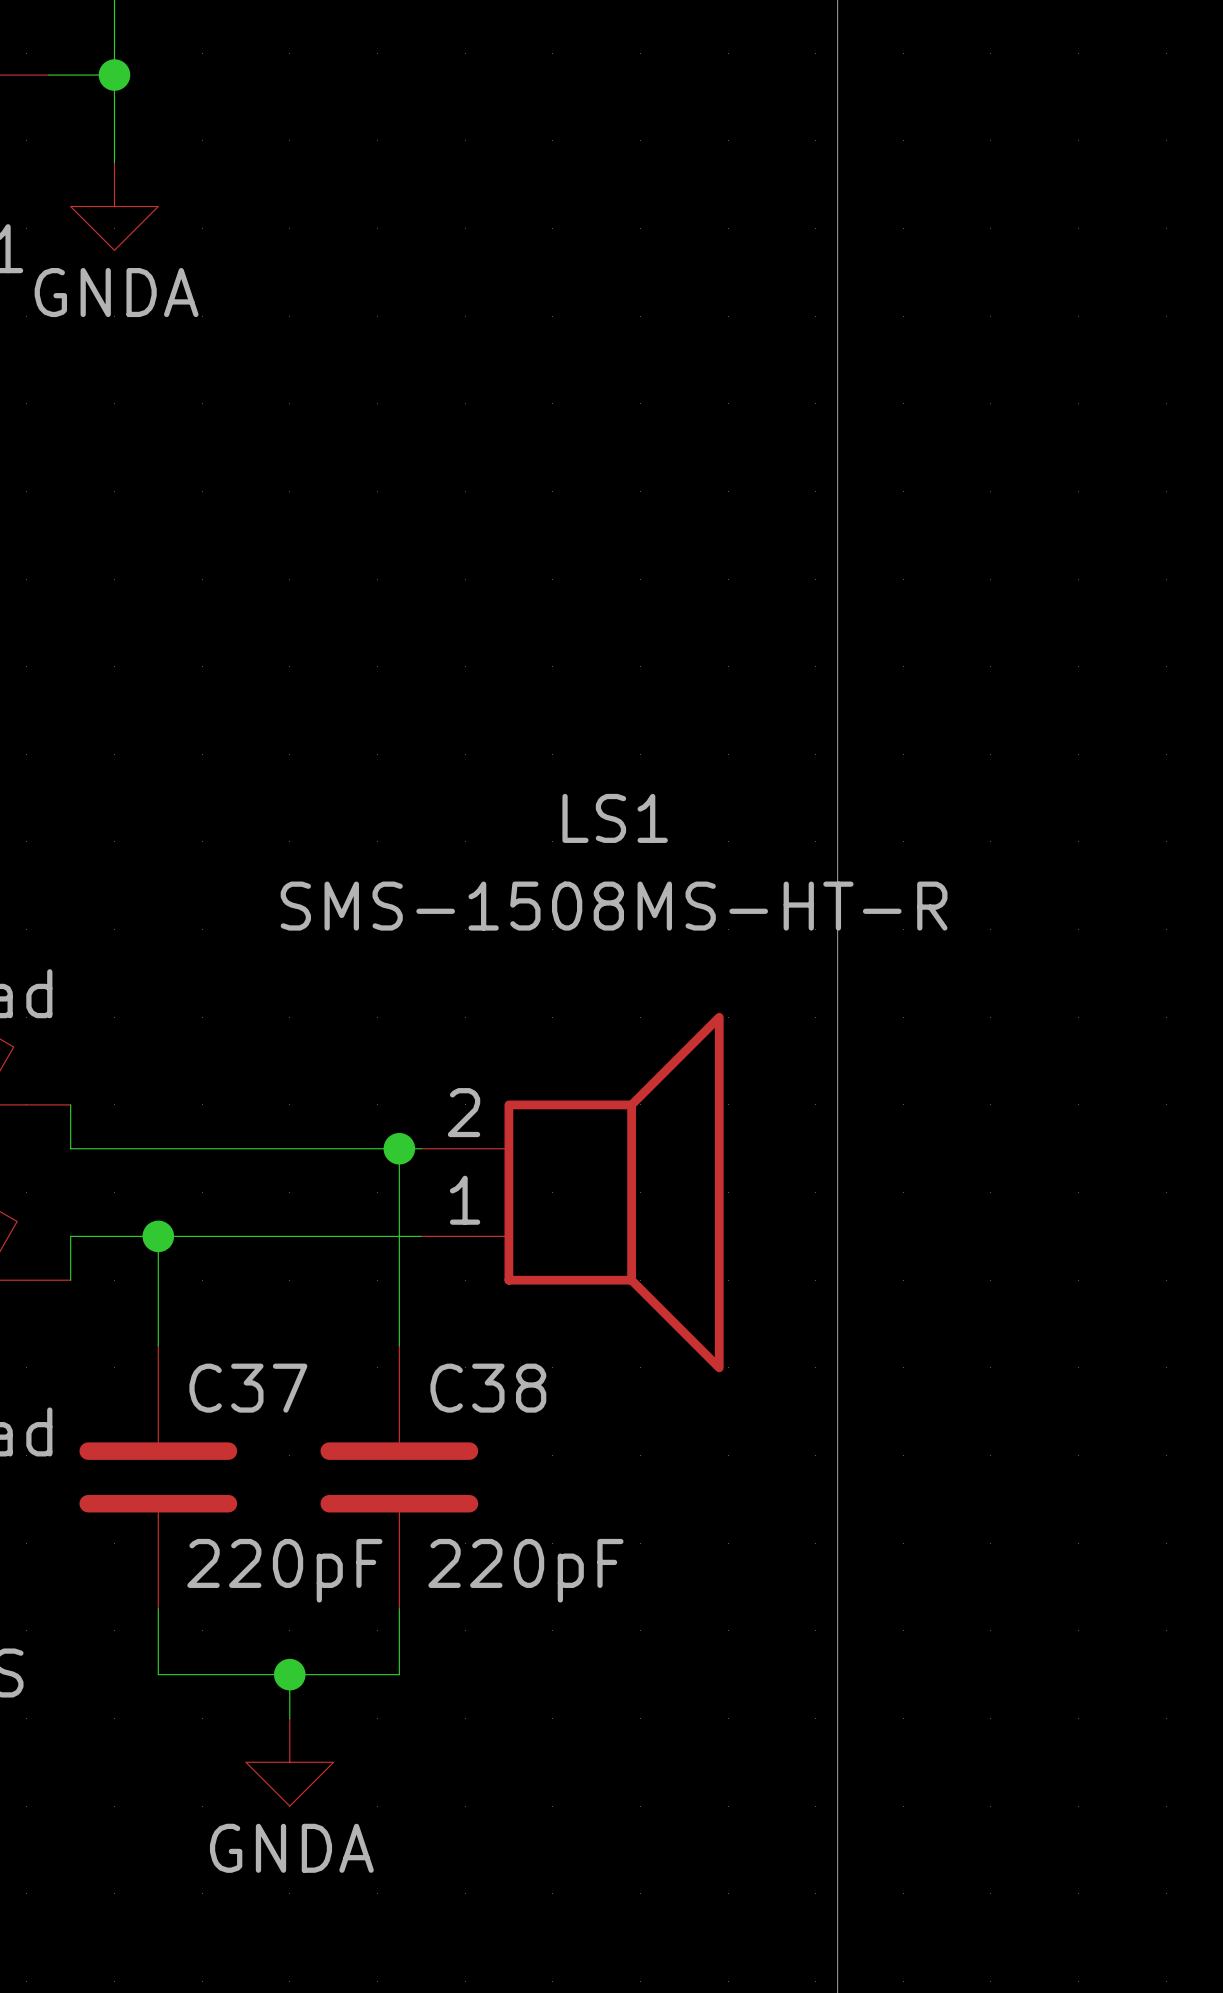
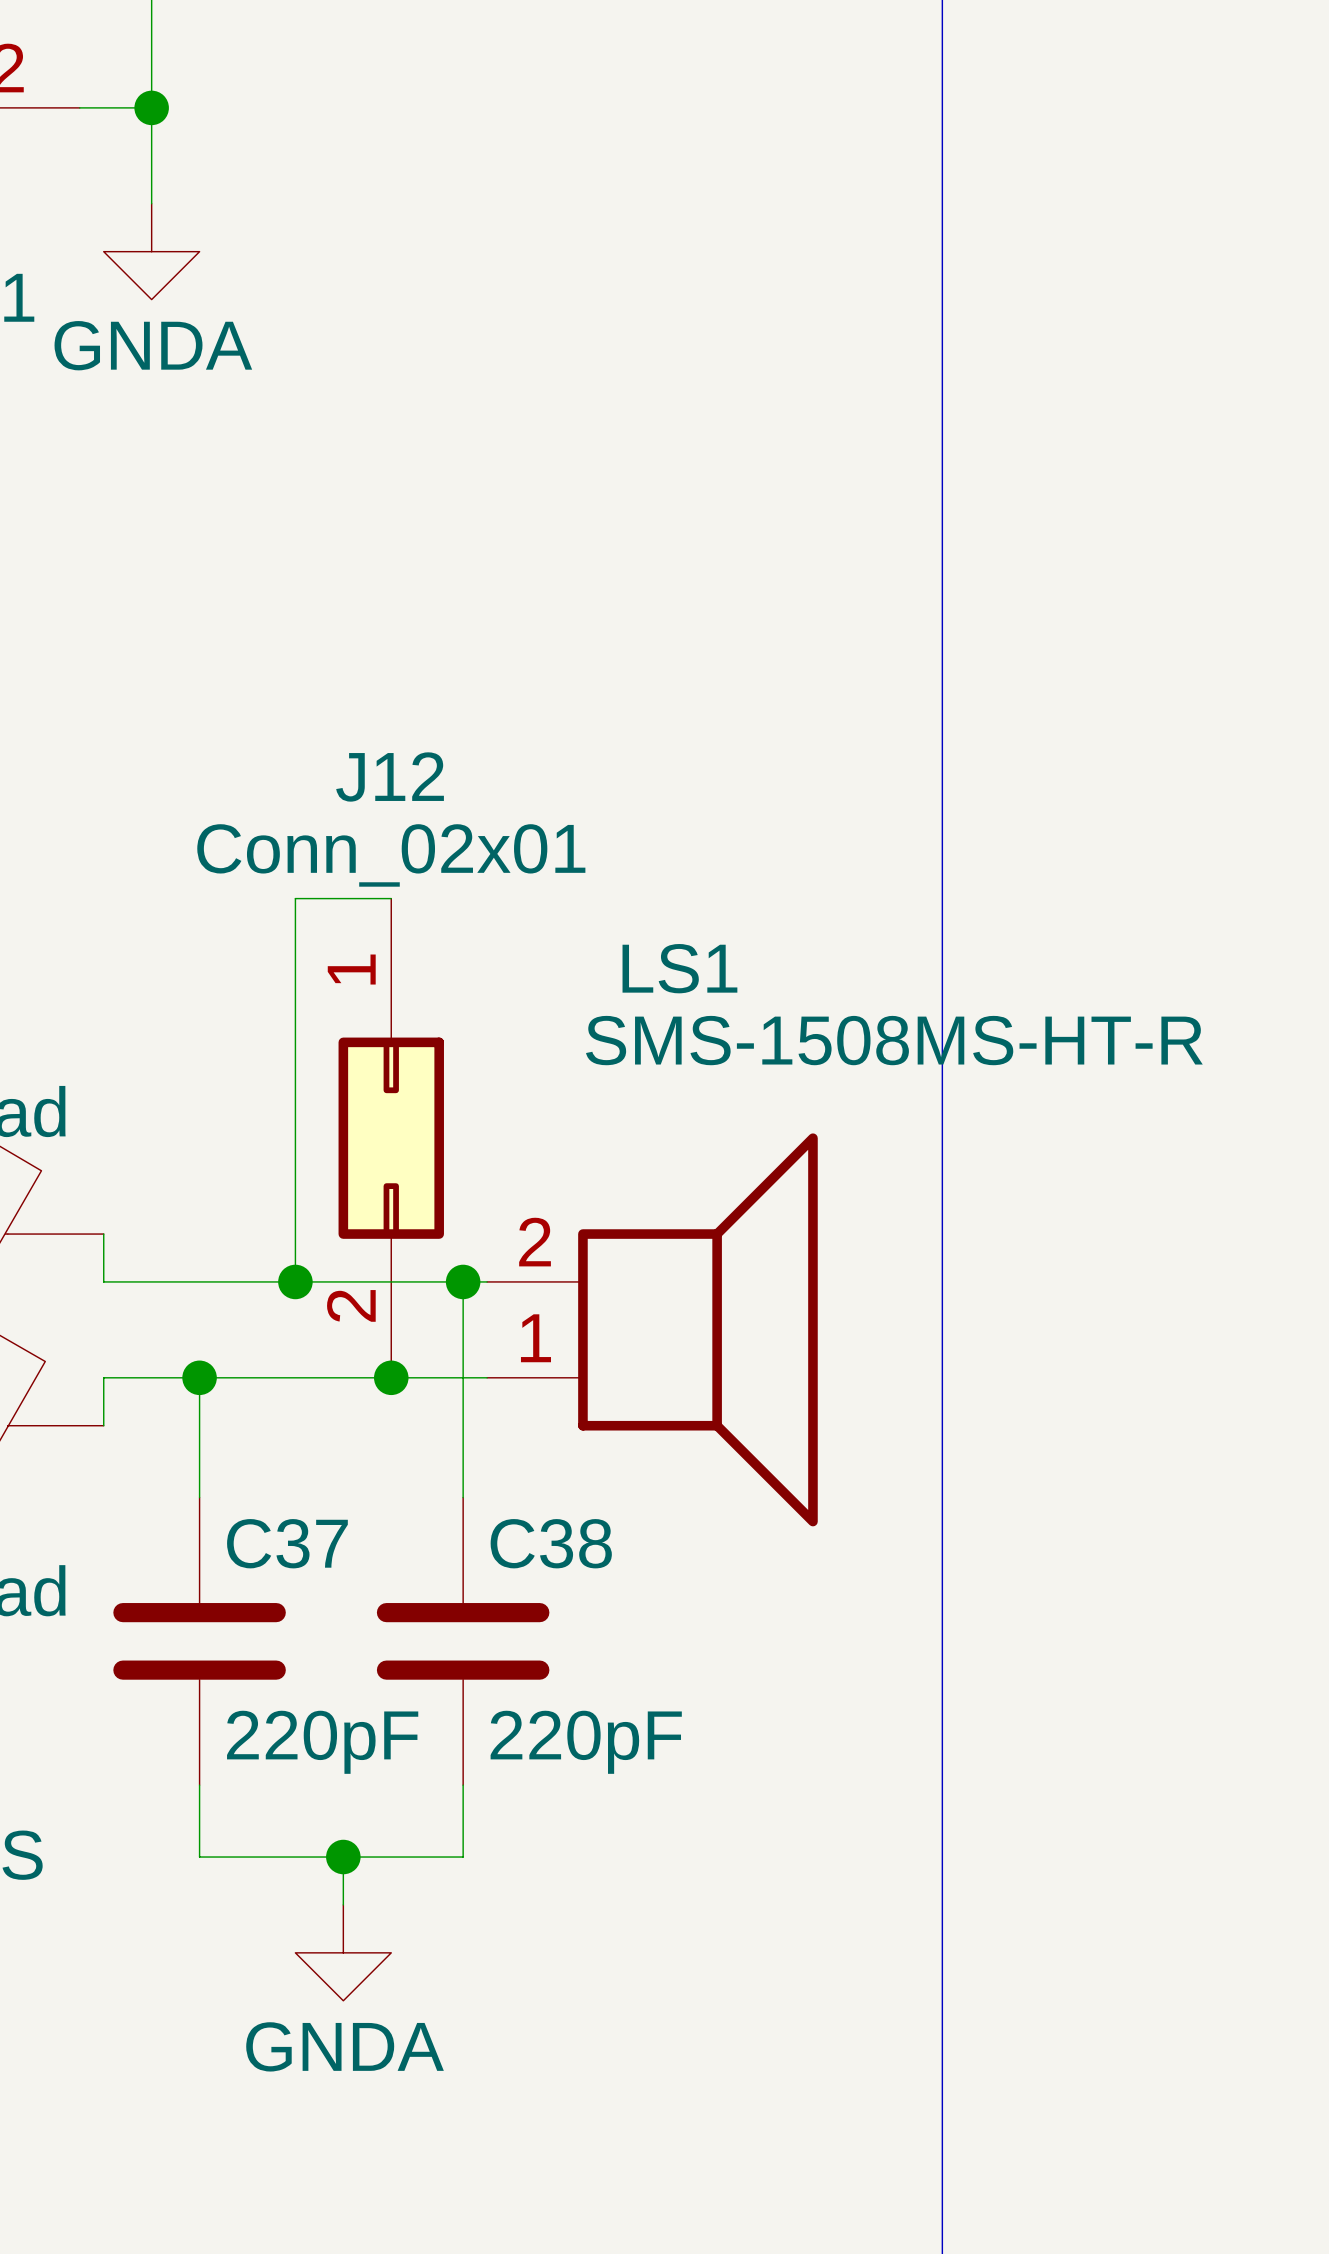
wire: none -> (391, 898) (295, 898) (295, 1281)
LS1 name position: LS1 (615, 818) -> LS1 (679, 968)
LS1 value position: SMS-1508MS-HT-R (614, 906) -> SMS-1508MS-HT-R (894, 1040)
J12: none -> Conn_02x01 (391, 1138)
junction: none -> (295, 1281)
junction: none -> (391, 1377)

